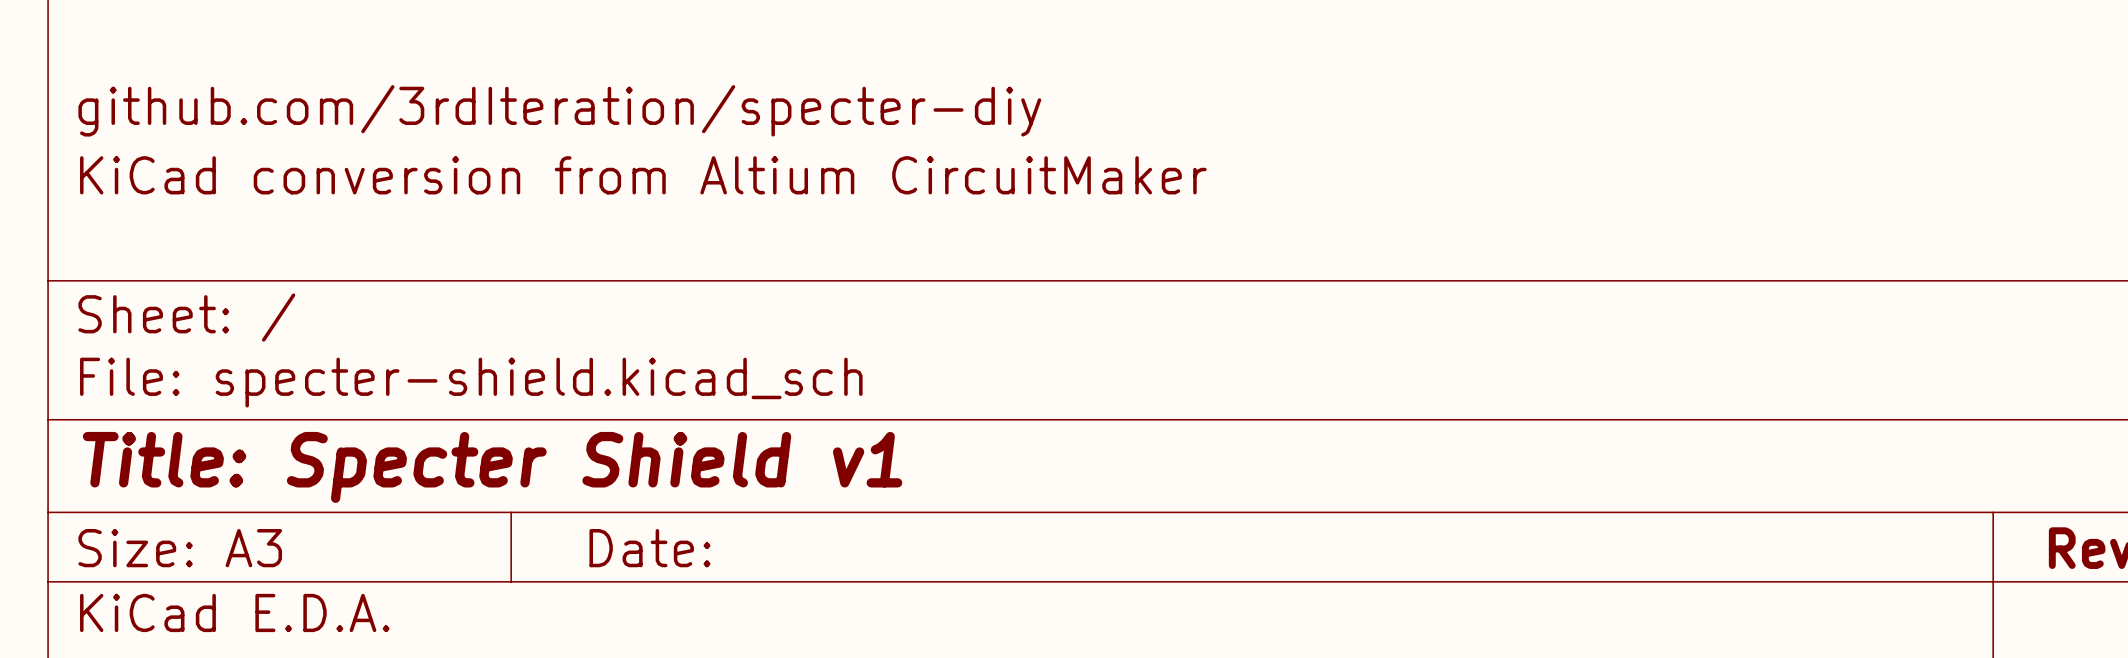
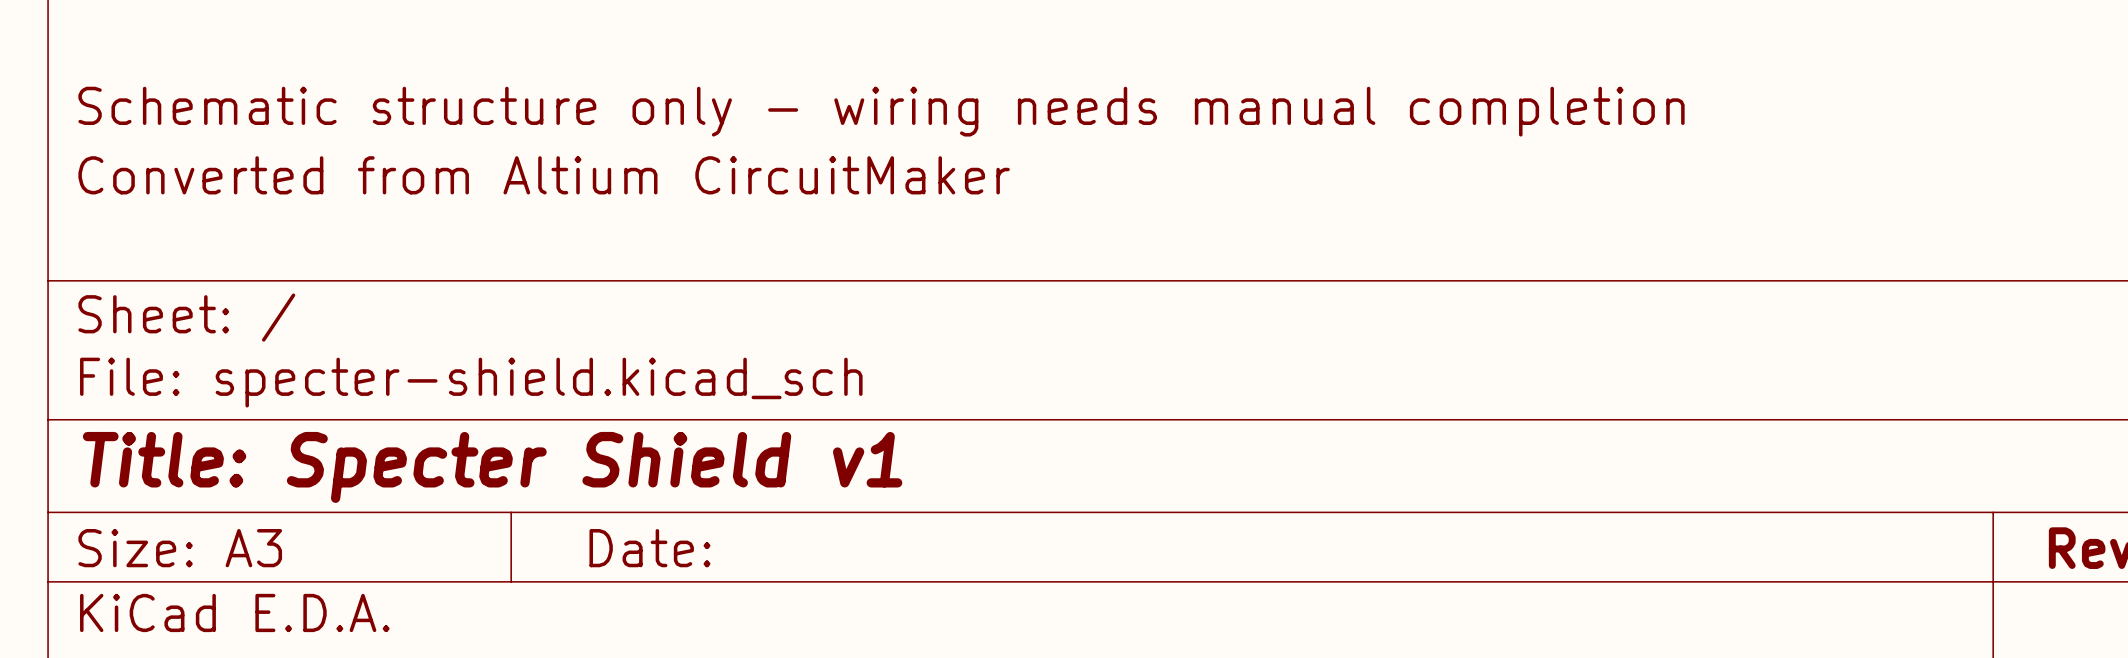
title block: github.com/3rdIteration/specter-diy (559, 110) -> Schematic structure only - wiring needs manual completion (881, 111)
title block: KiCad conversion from Altium CircuitMaker (643, 175) -> Converted from Altium CircuitMaker (544, 175)

